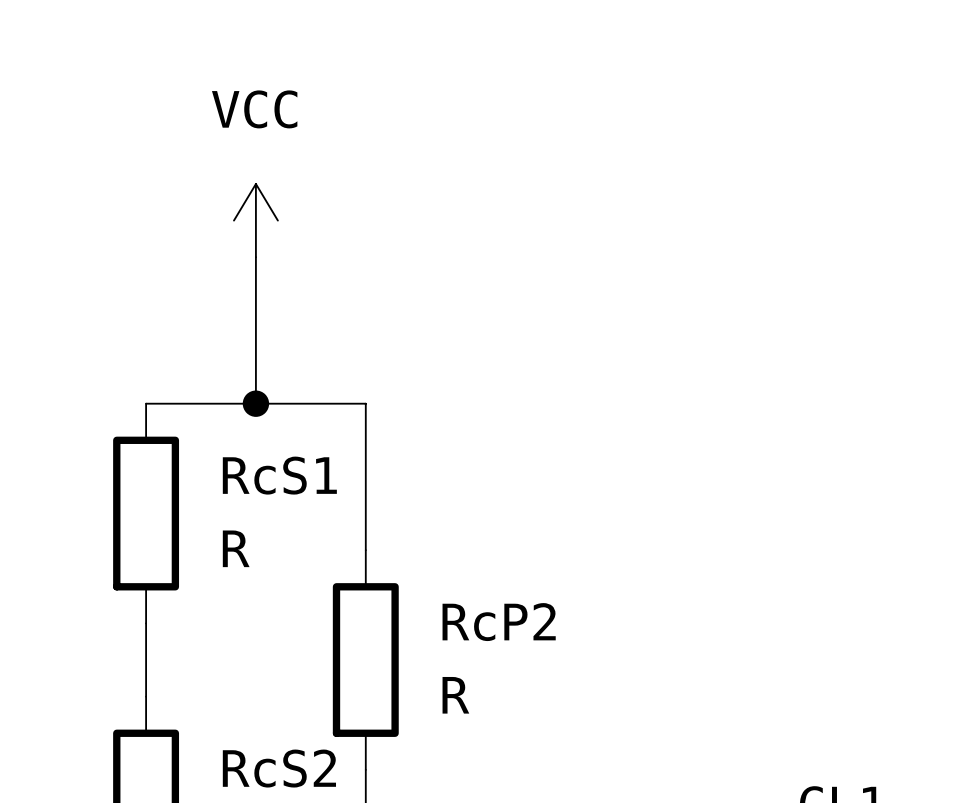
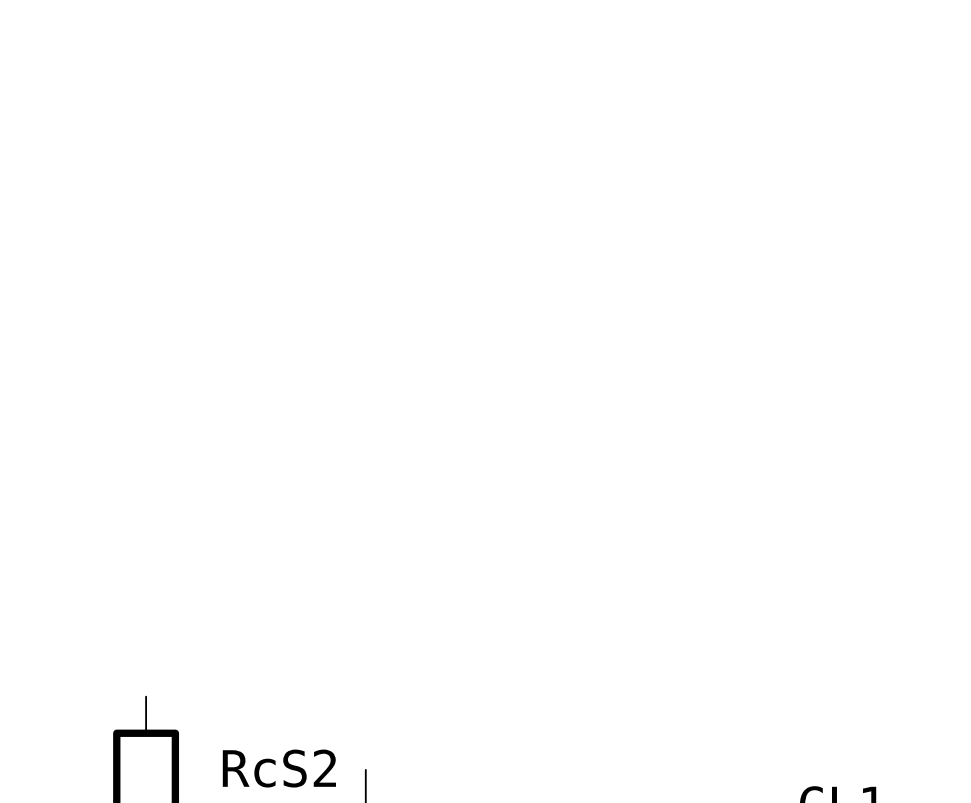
power symbol: VCC (255, 220) -> none
wire: (255, 257) (255, 403) -> none
wire: (146, 403) (365, 403) (365, 550) -> none
junction: (255, 403) -> none
RcS1: R (146, 513) -> none
wire: (146, 623) (146, 696) -> none
RcP2: R (365, 660) -> none

